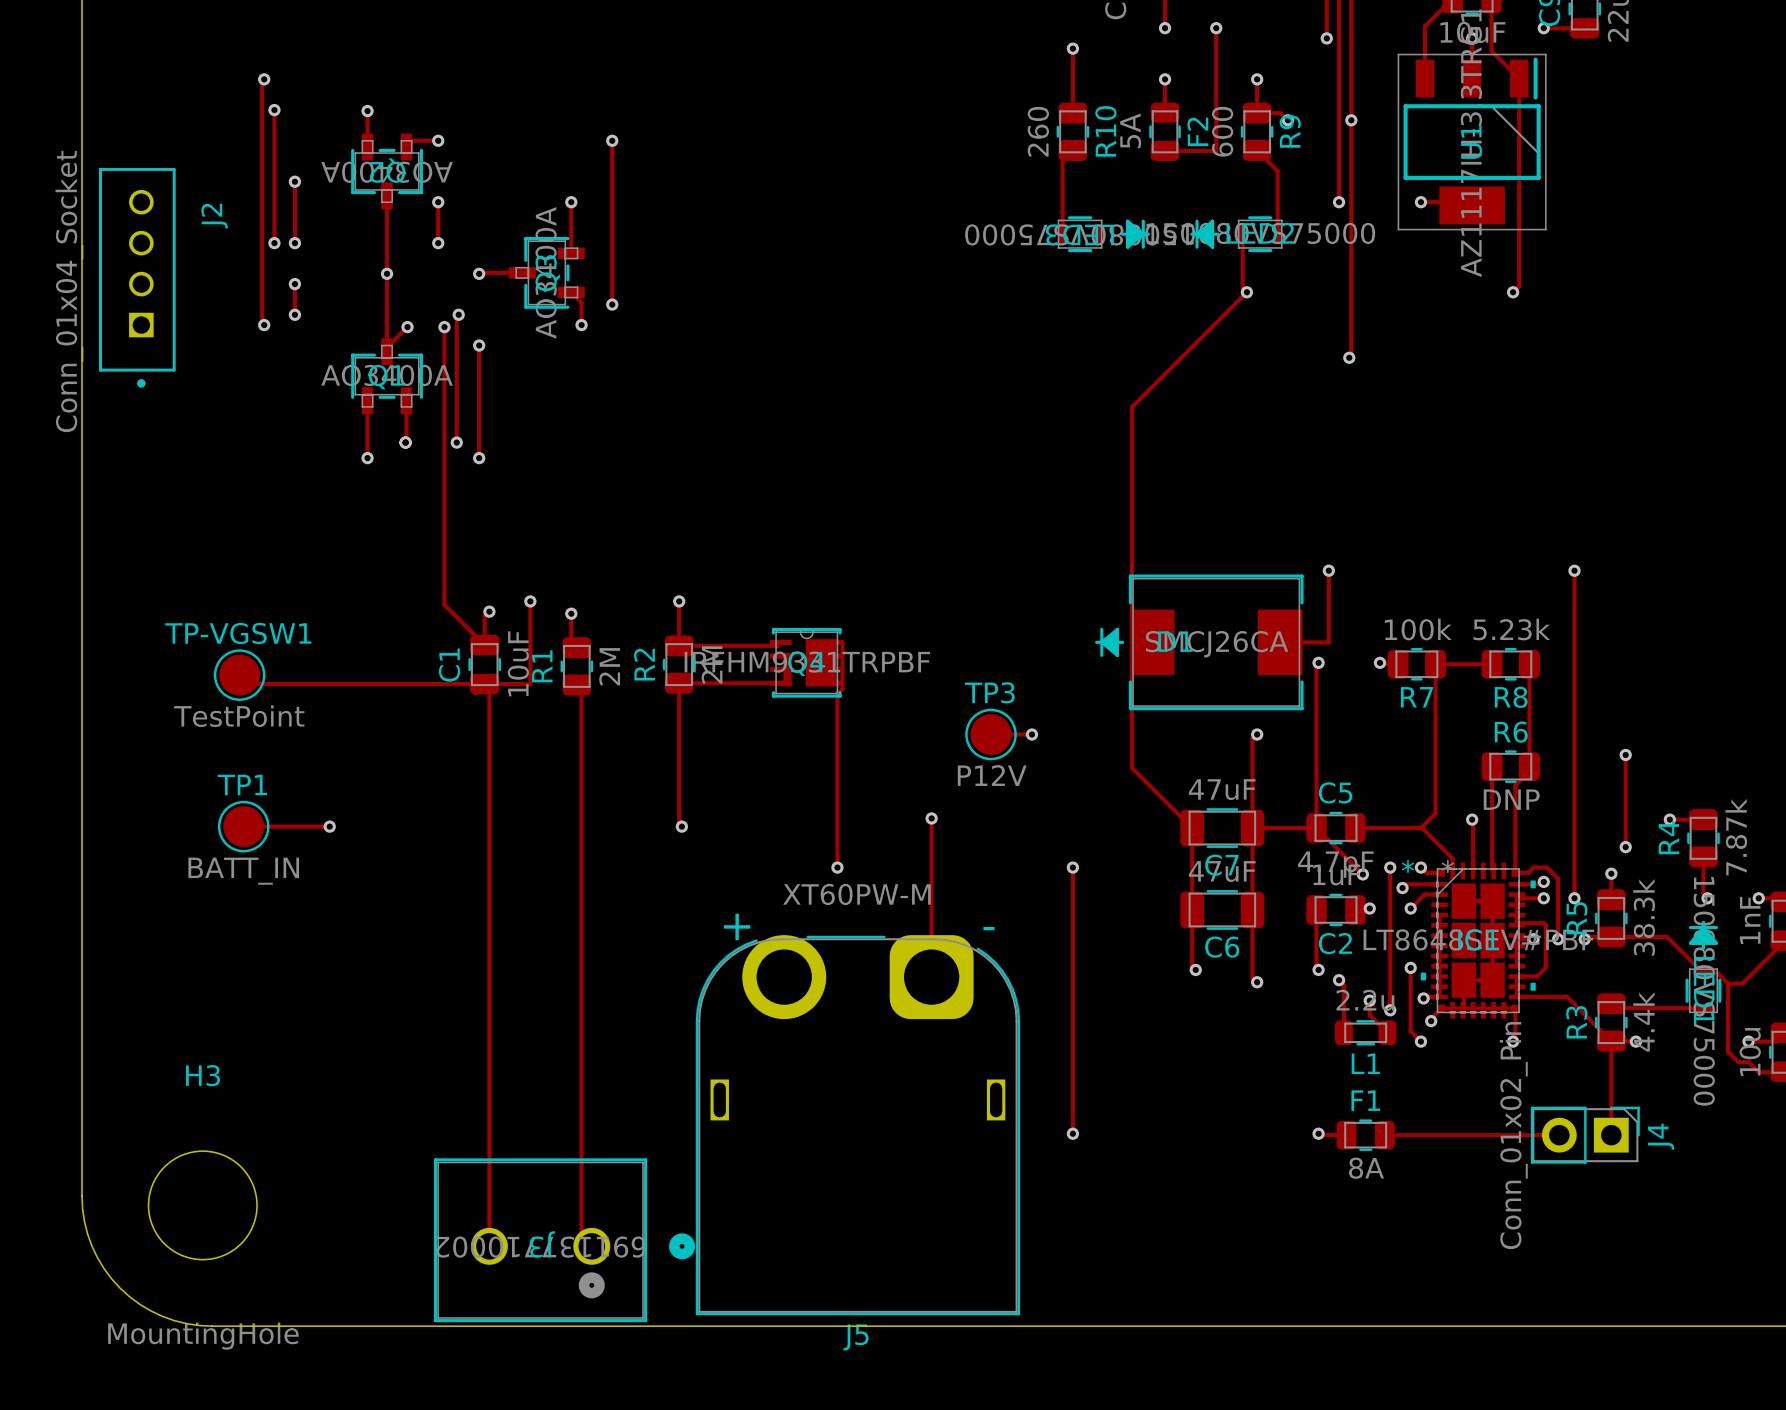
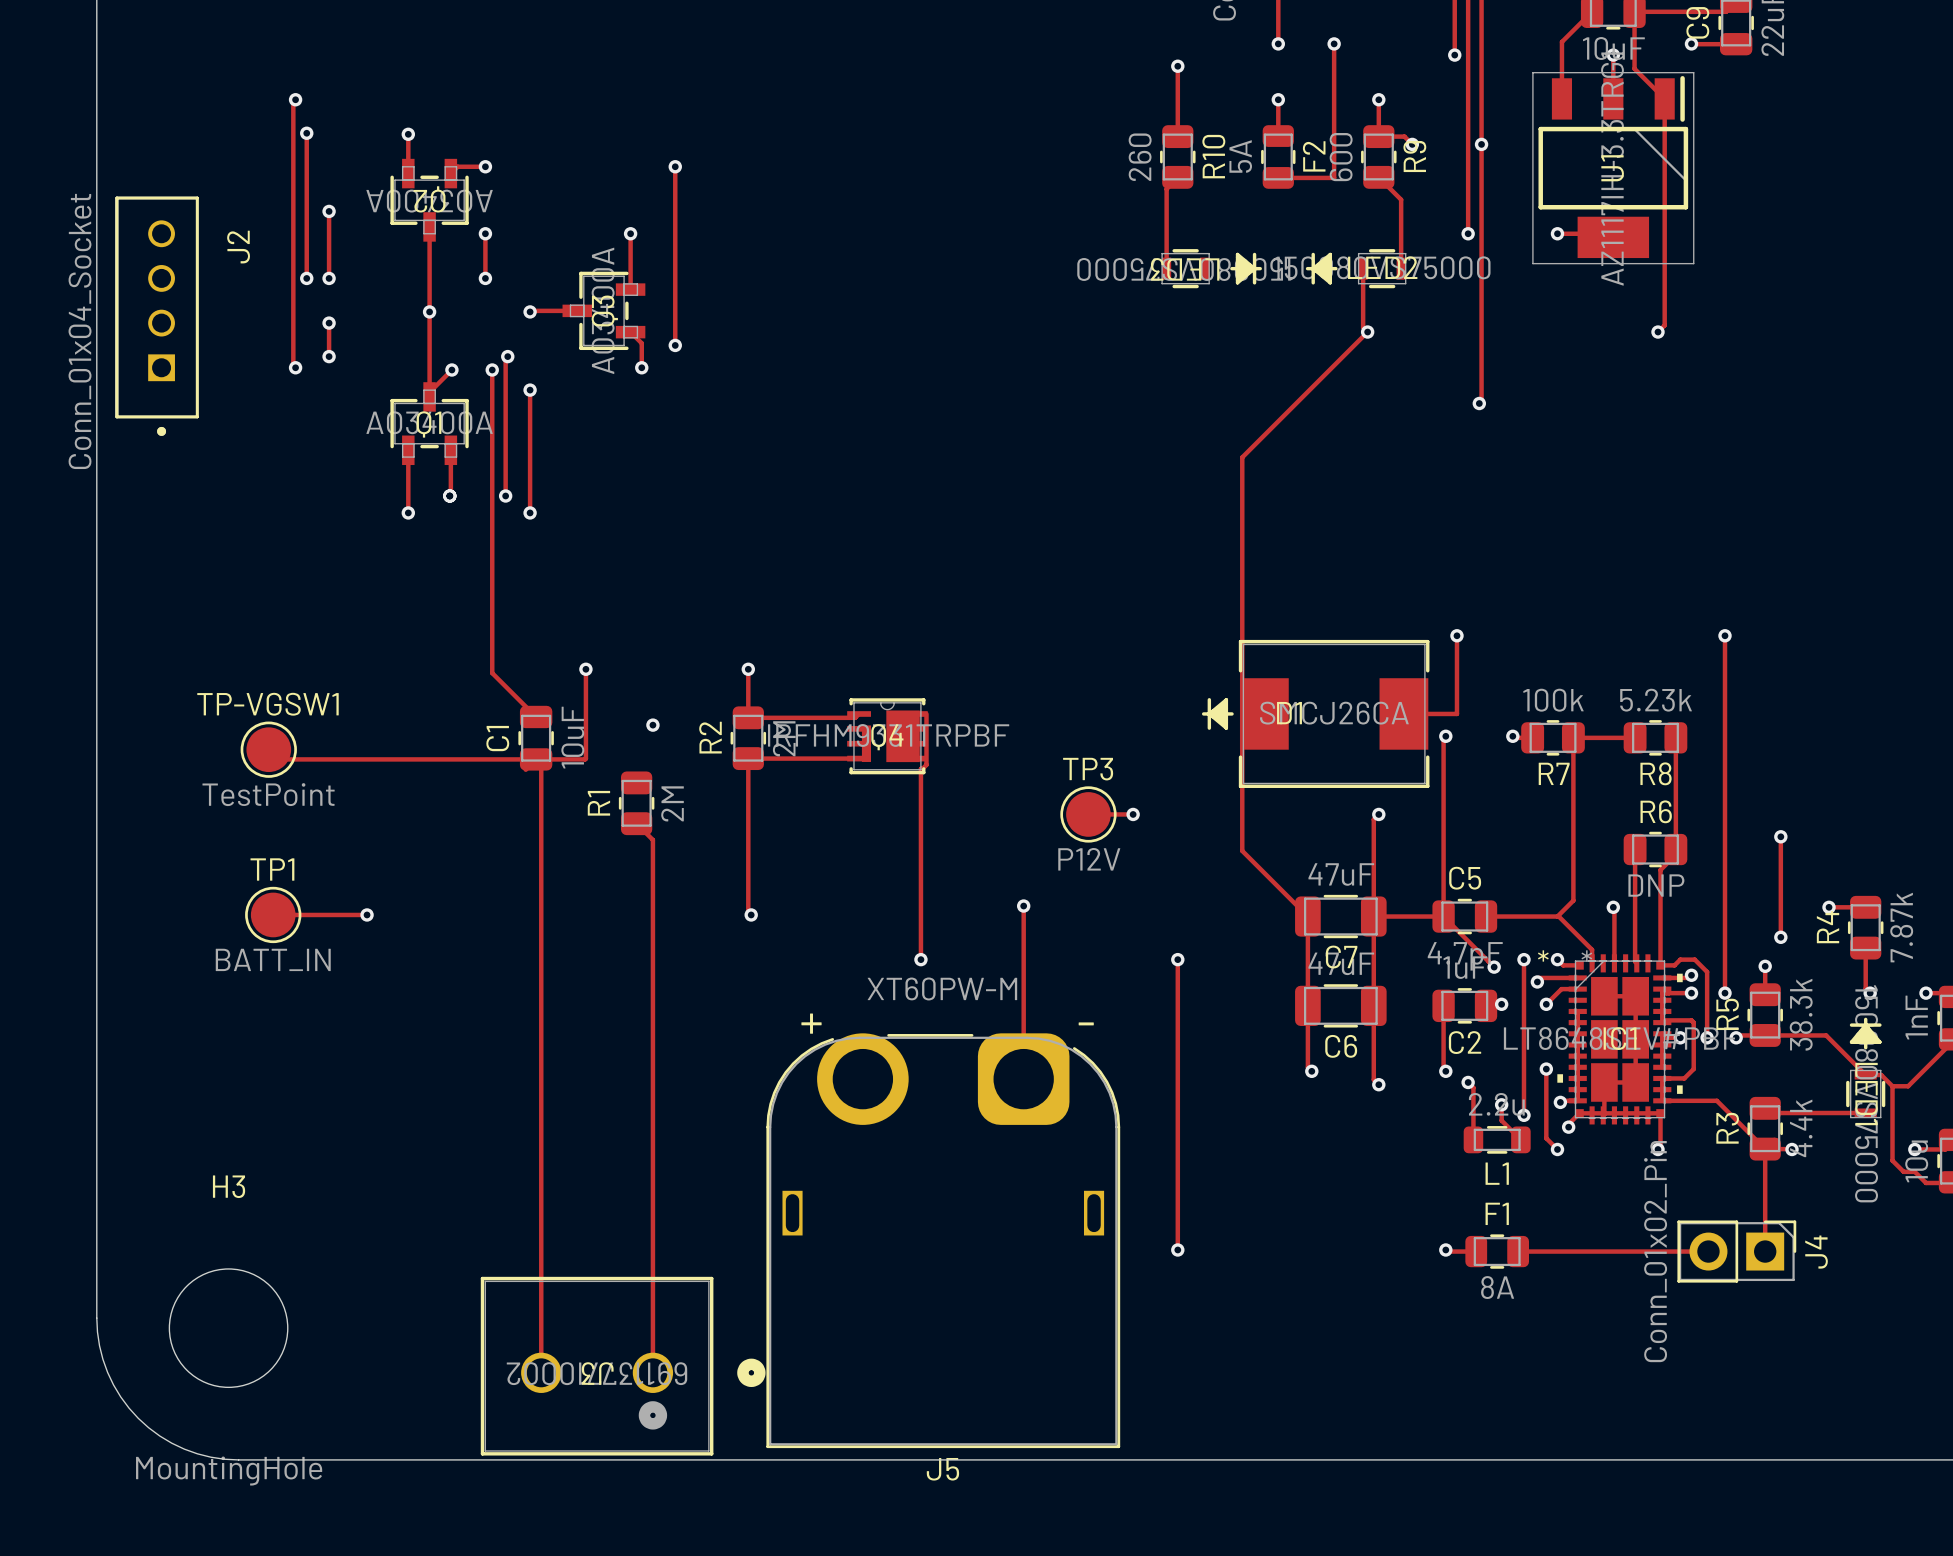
track: (489, 611) (484, 616) (484, 645) -> none
via: (489, 611) -> none
track: (571, 613) (571, 642) (576, 647) -> none
via position: (571, 613) -> (652, 725)
R1 position: (576, 666) -> (636, 803)
track: (576, 685) (581, 689) (581, 1236) -> none
track: none -> (636, 823) (652, 839) (652, 1372)

